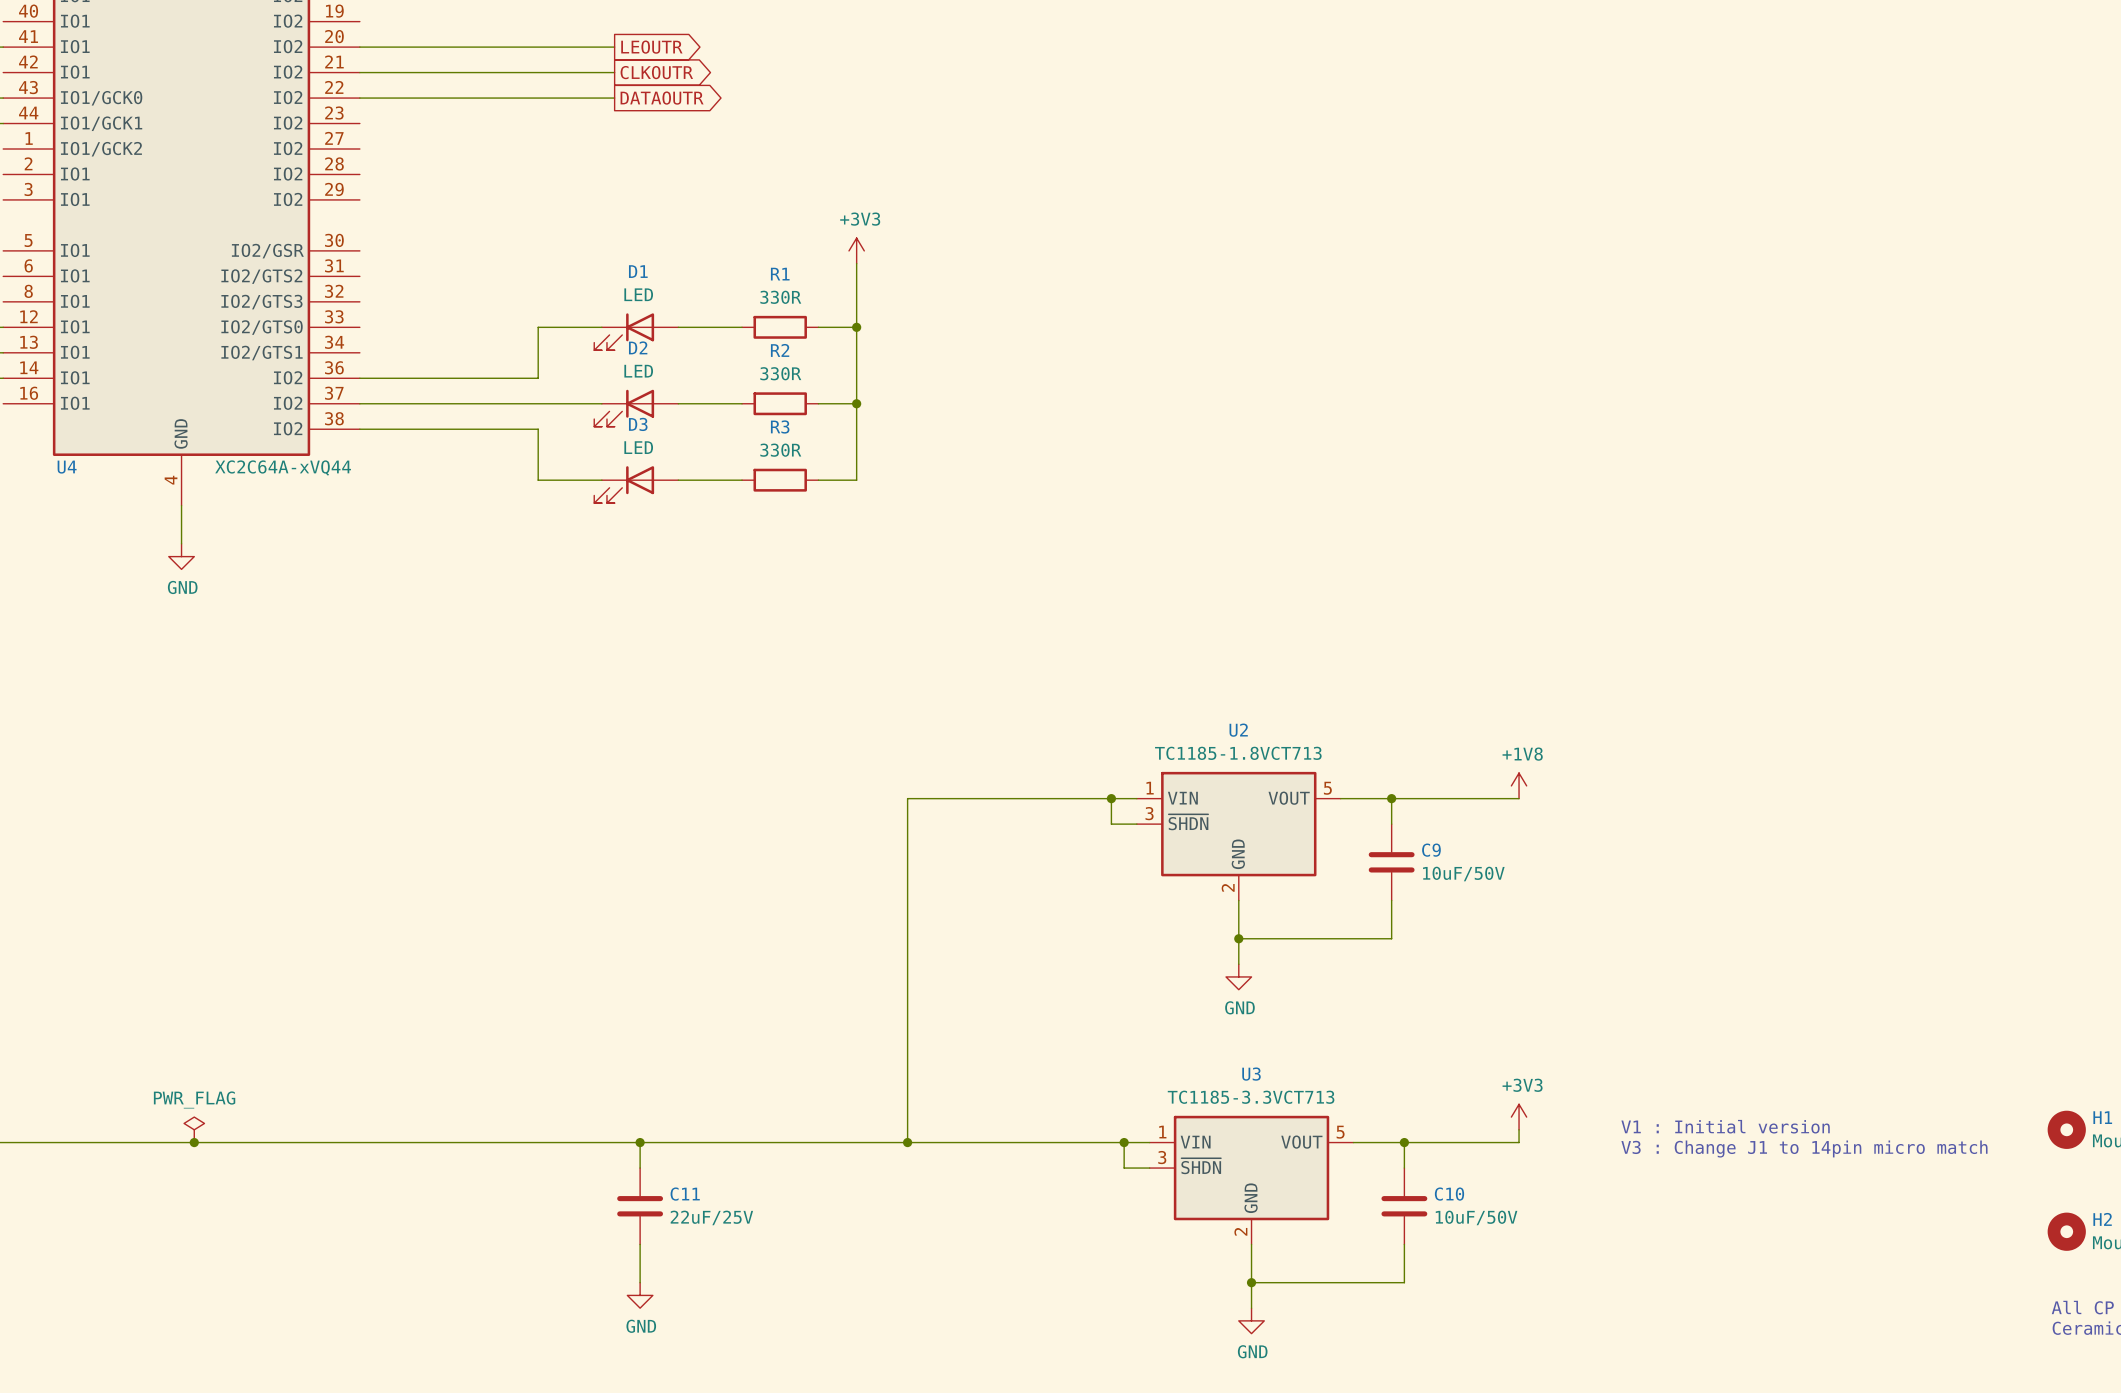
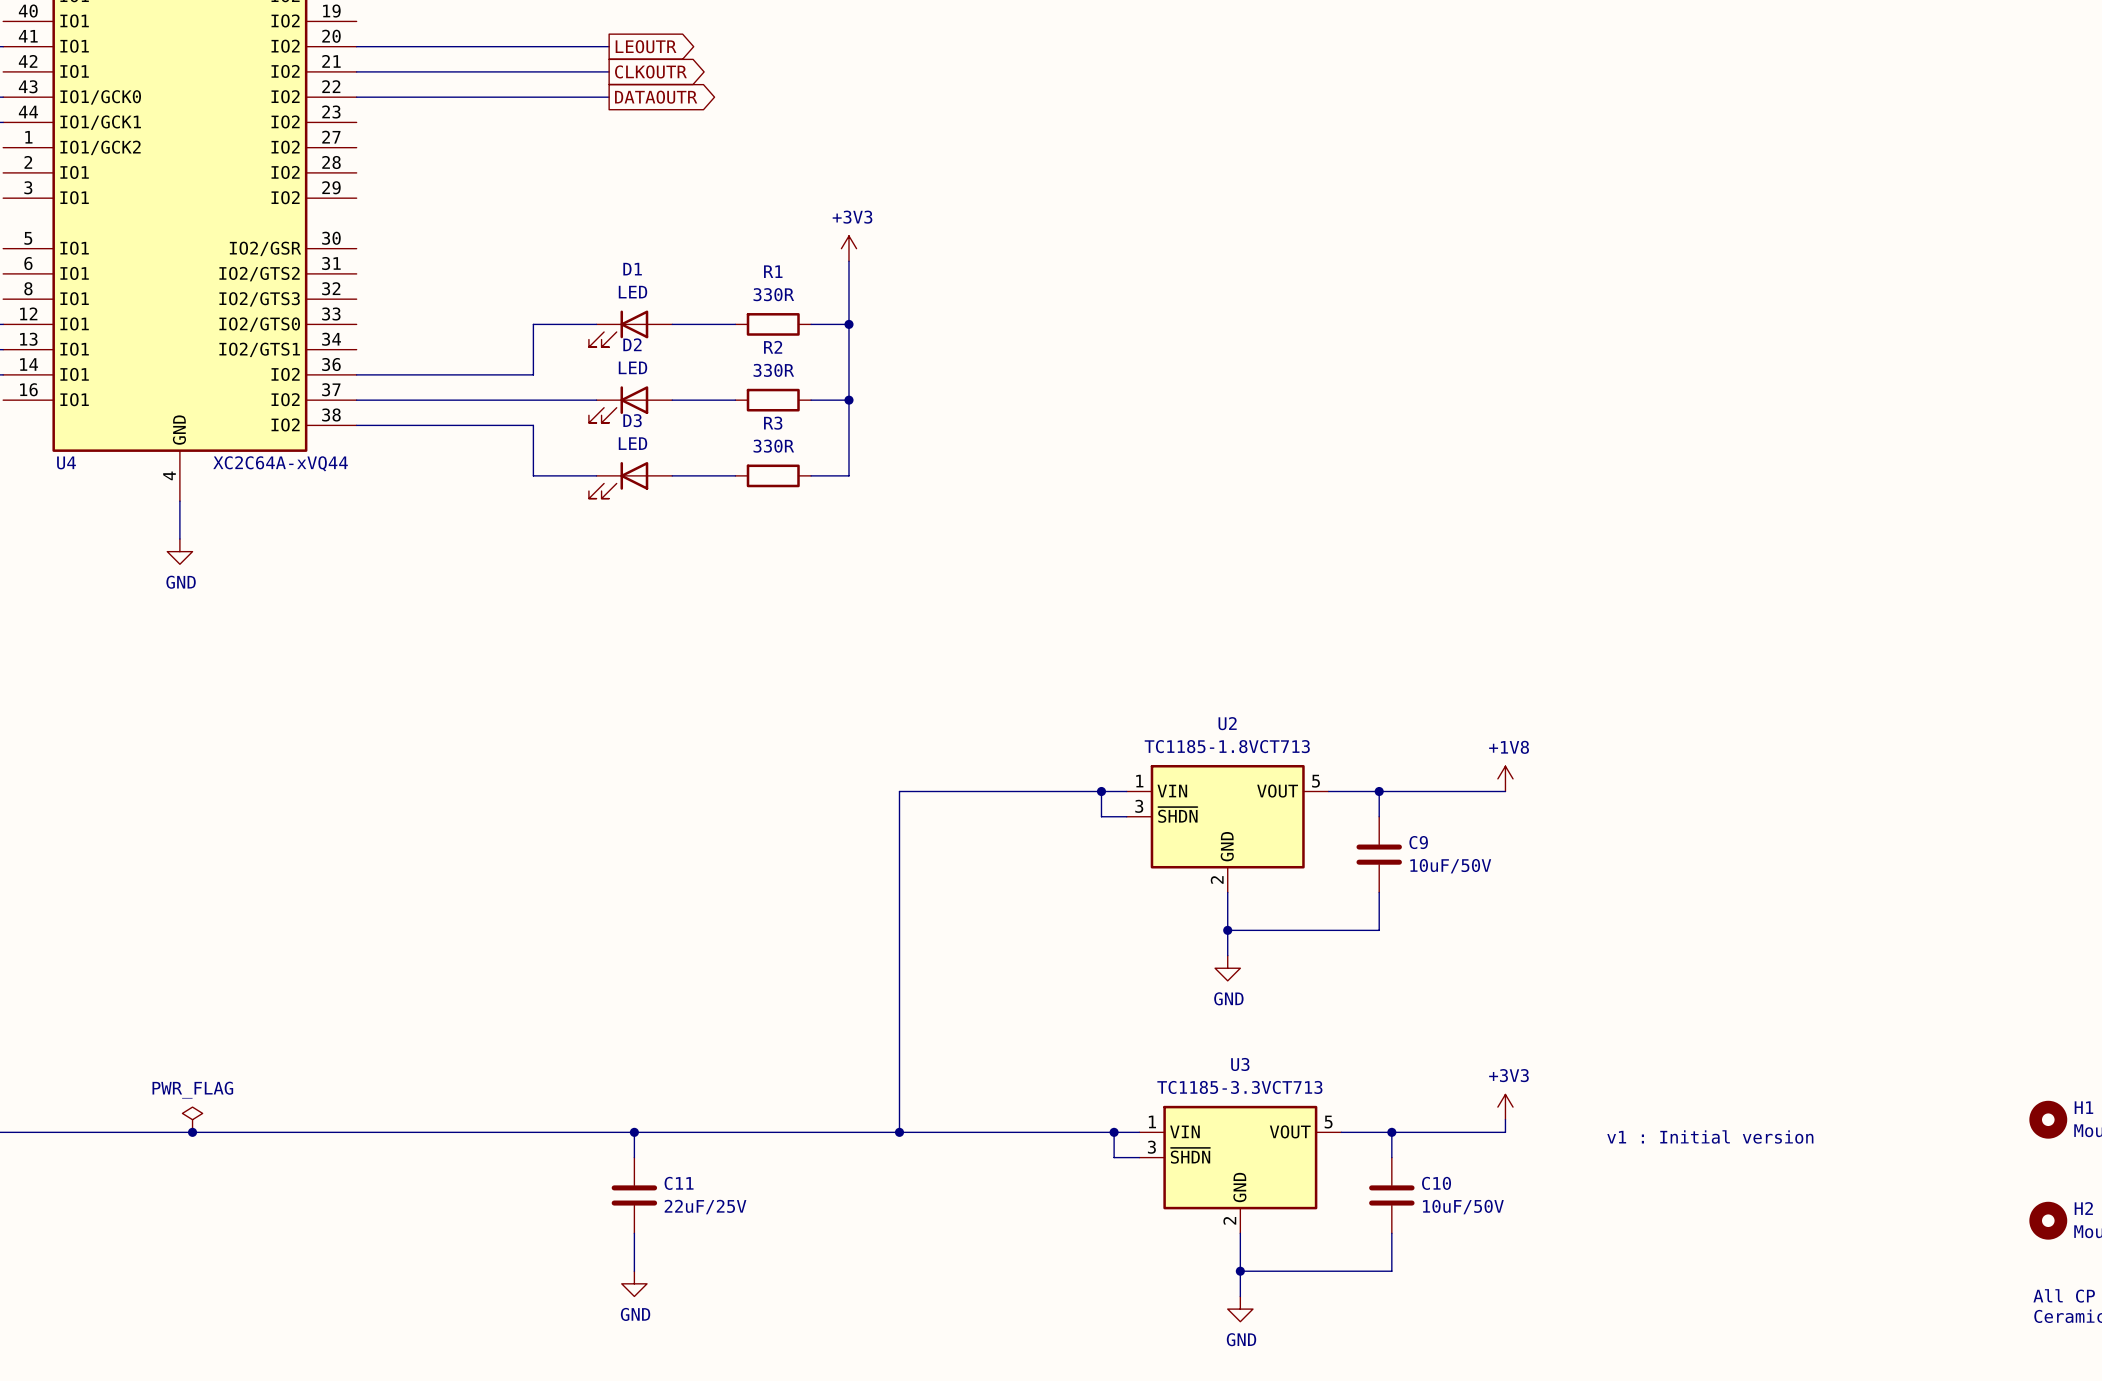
text: V1 : Initial version (1725, 1126) -> none
text: V3 : Change J1 to 14pin micro match (1804, 1149) -> v1 : Initial version (1710, 1136)

